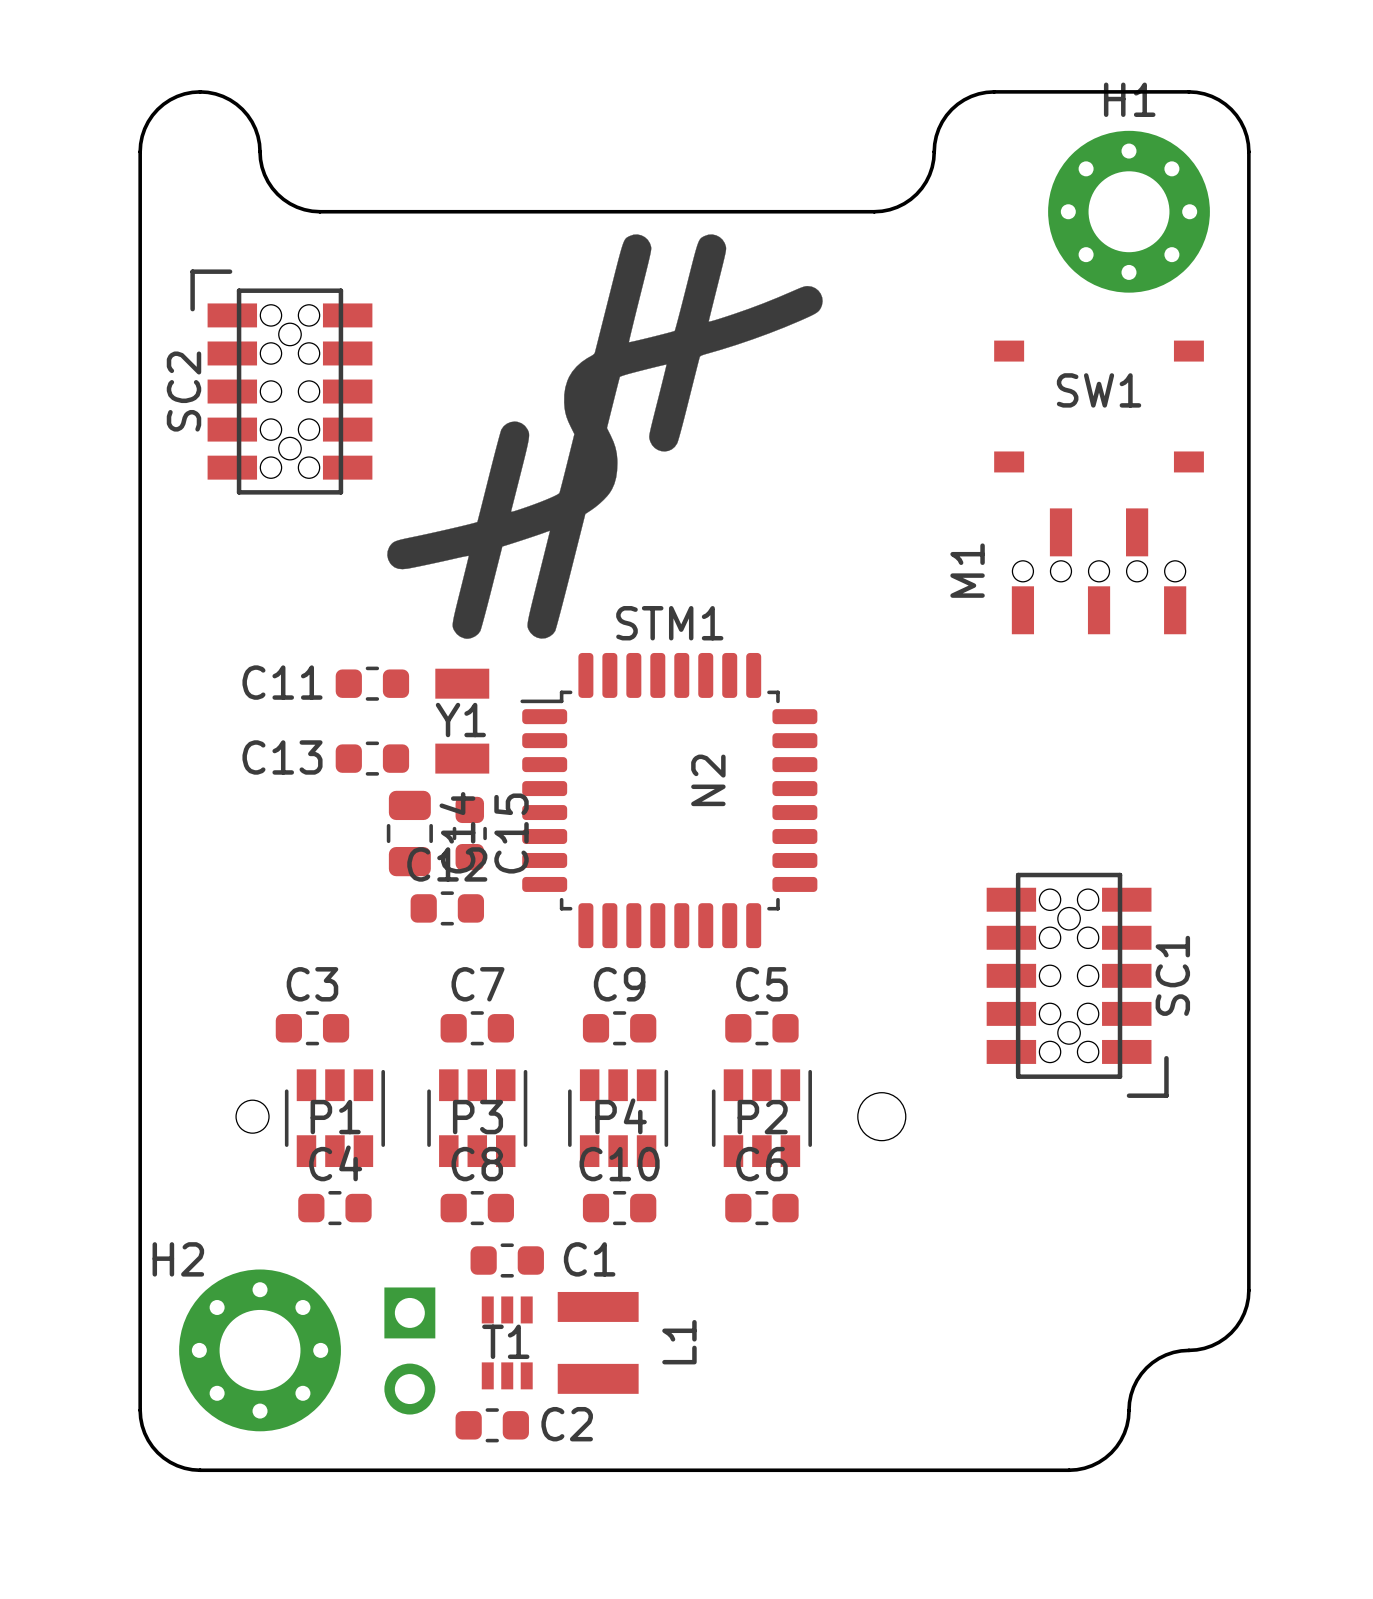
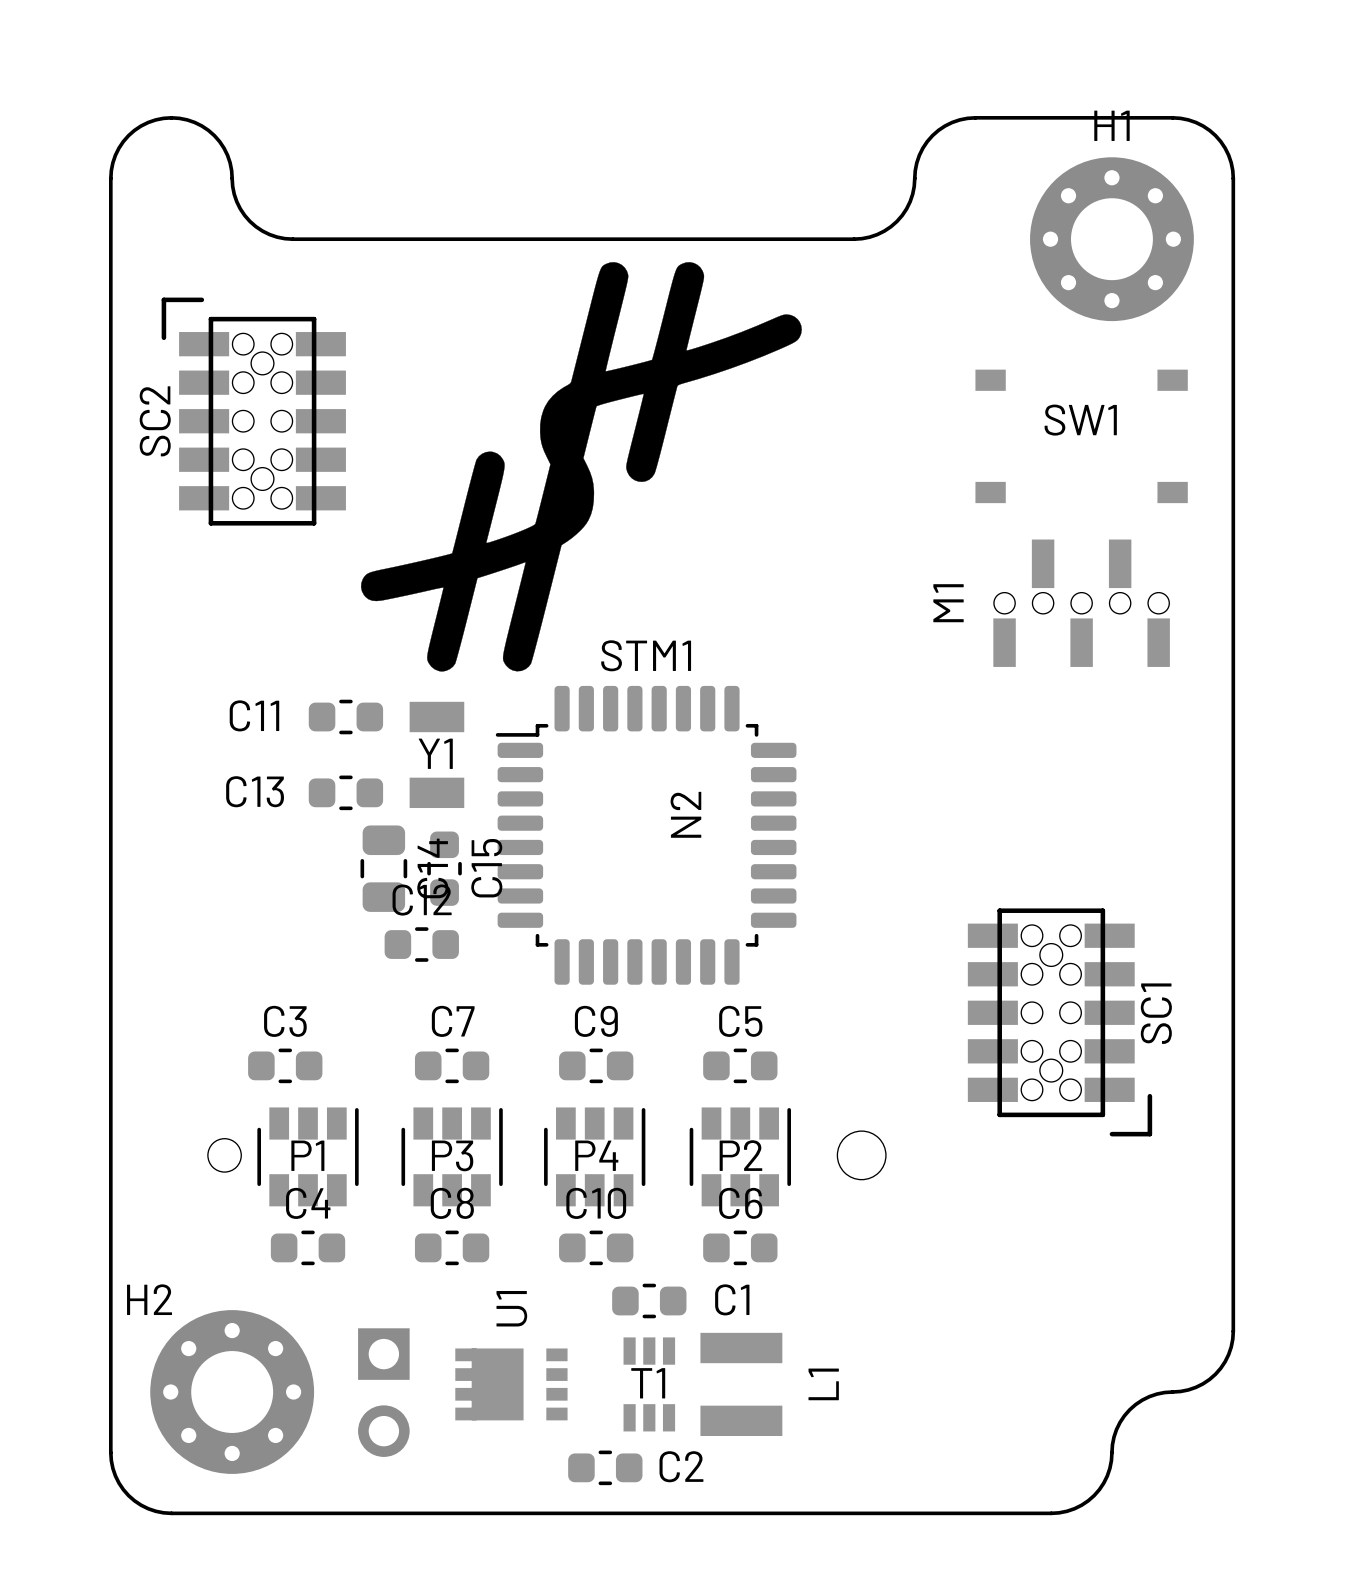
C1 position: (507, 1260) -> (649, 1300)
T1 position: (507, 1342) -> (649, 1384)
U1: none -> (511, 1384)
L1 position: (598, 1342) -> (741, 1384)
C2 position: (492, 1425) -> (605, 1467)

